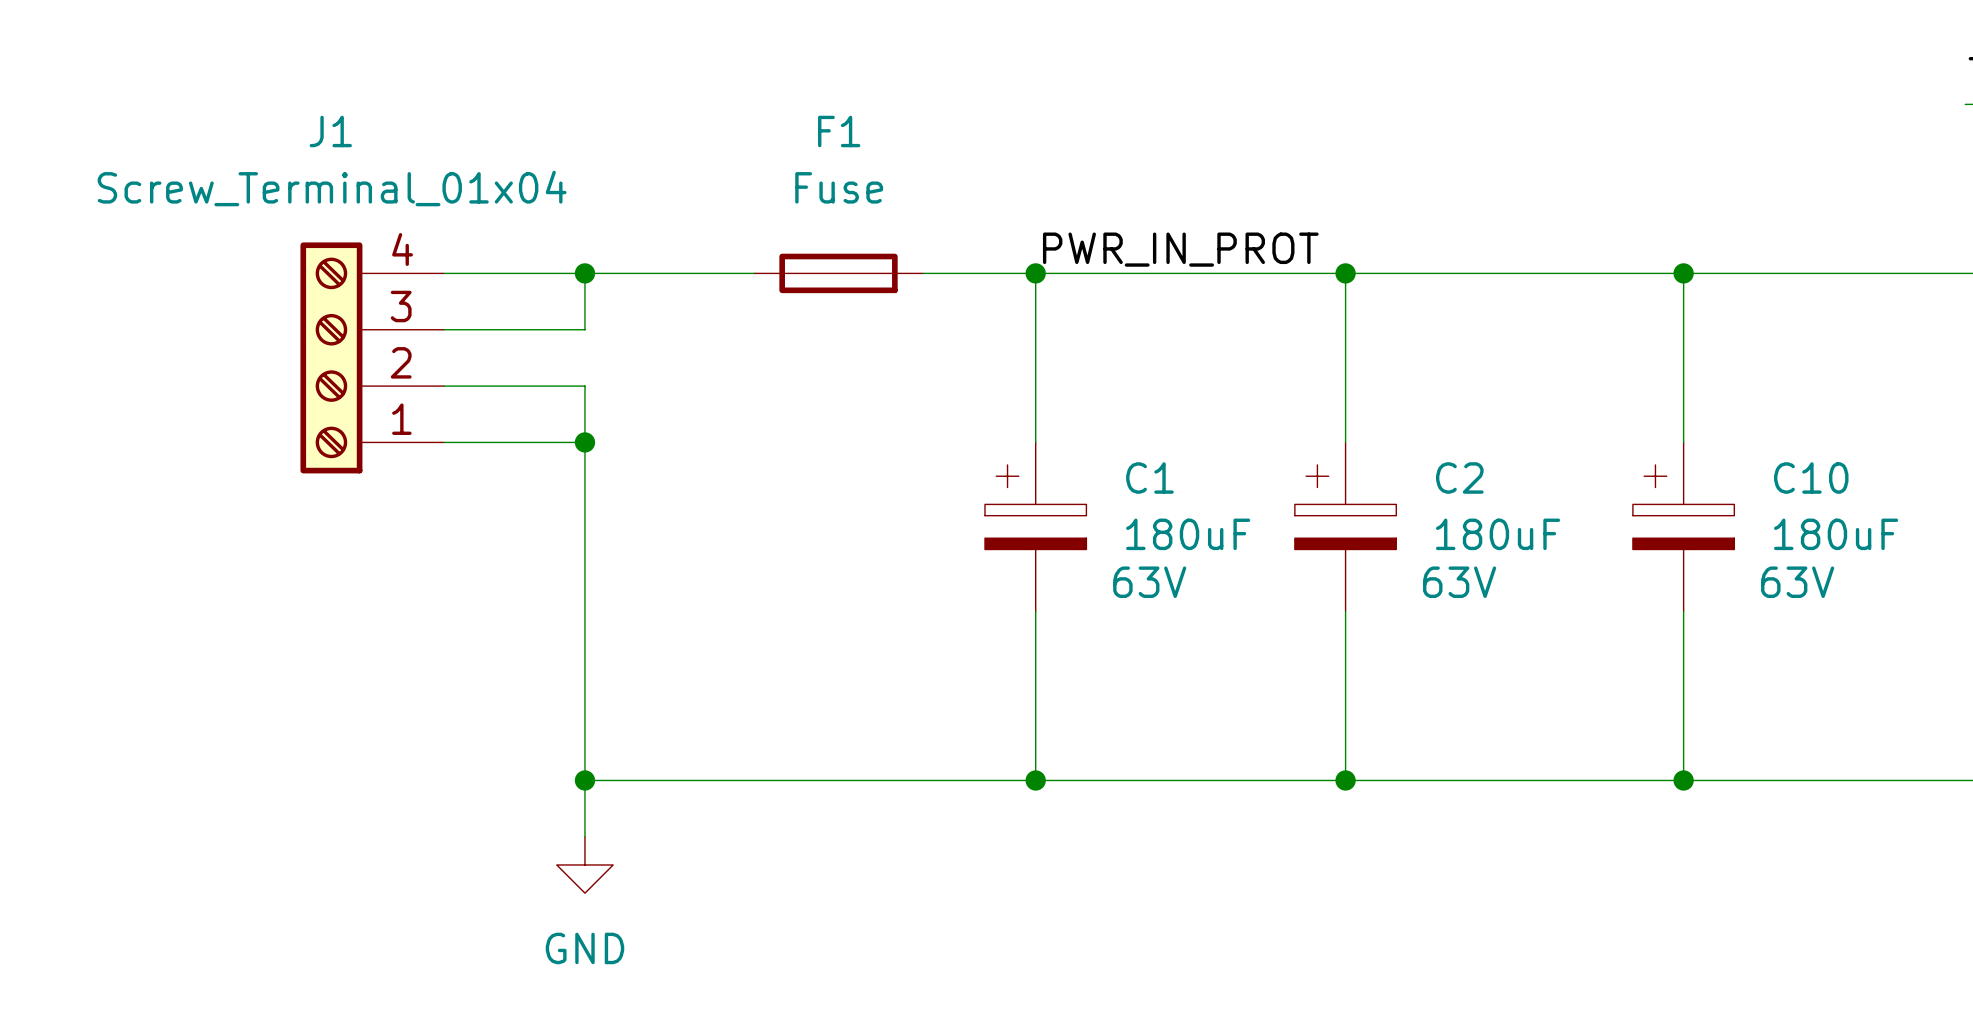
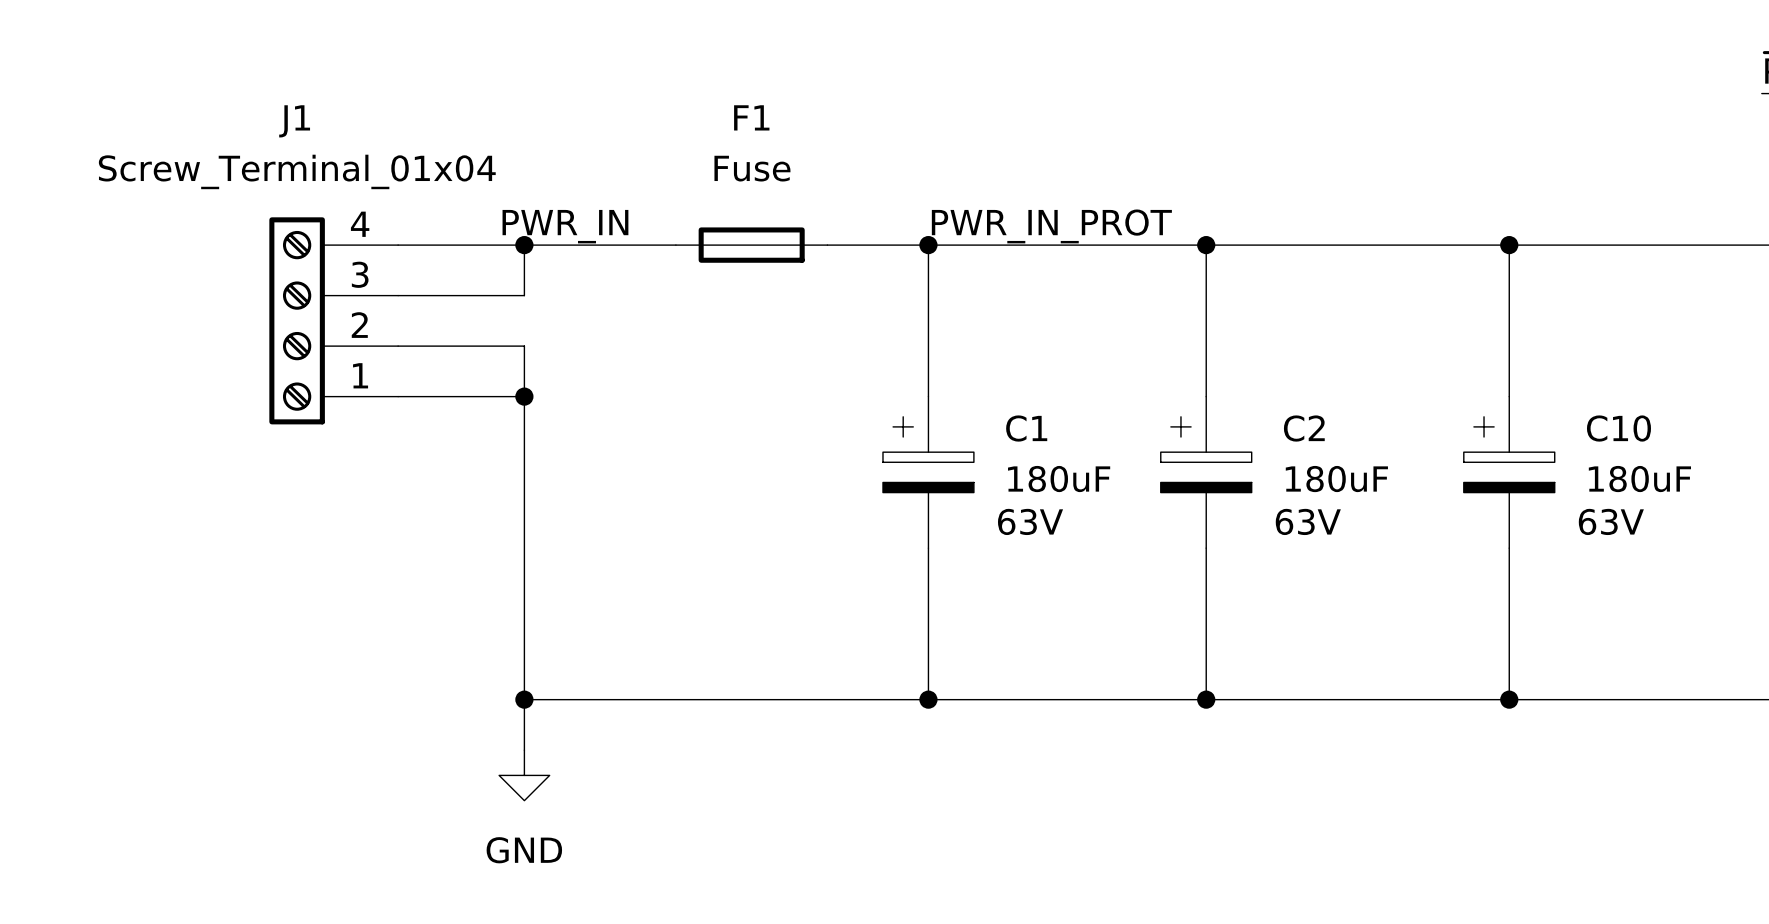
label: none -> PWR_IN (565, 226)

